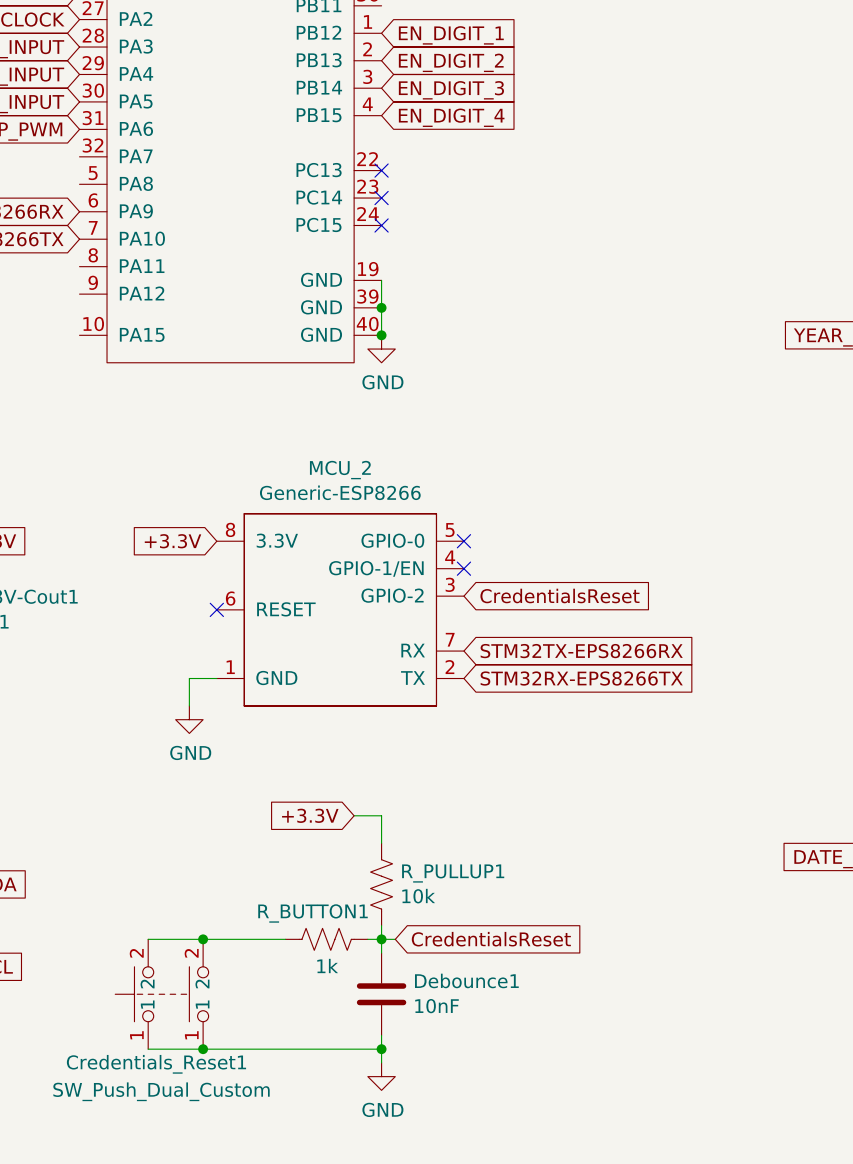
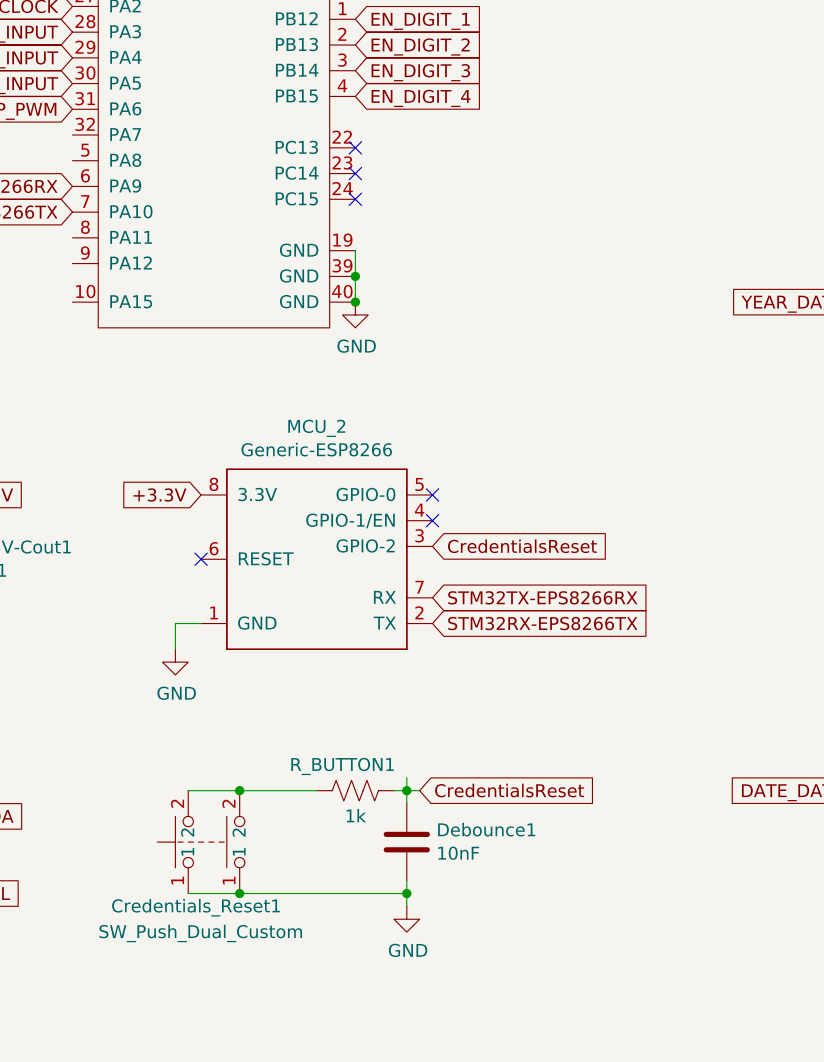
global label: +3.3V (310, 815) -> none
wire: (354, 815) (381, 815) (381, 843) -> none
junction: none -> (239, 790)
junction: none -> (406, 790)
R_PULLUP1: 10k (381, 884) -> none
wire: (381, 925) (381, 953) -> (406, 777) (406, 803)
wire: (148, 939) (285, 939) -> (188, 790) (316, 790)
junction: (203, 939) -> none
R_BUTTON1 position: (326, 939) -> (355, 790)
wire: (367, 939) (395, 939) -> (393, 790) (419, 790)
junction: (381, 939) -> none
global label position: CredentialsReset (491, 939) -> CredentialsReset (509, 790)
junction: none -> (239, 893)
junction: none -> (406, 893)
Credentials_Reset1 position: (161, 994) -> (201, 842)
Debounce1 position: (381, 994) -> (406, 842)
wire: (381, 1035) (381, 1062) -> (406, 880) (406, 906)
wire: (148, 1049) (381, 1049) -> (188, 893) (406, 893)
junction: (203, 1049) -> none
junction: (381, 1049) -> none
power symbol position: GND (381, 1076) -> GND (406, 919)

